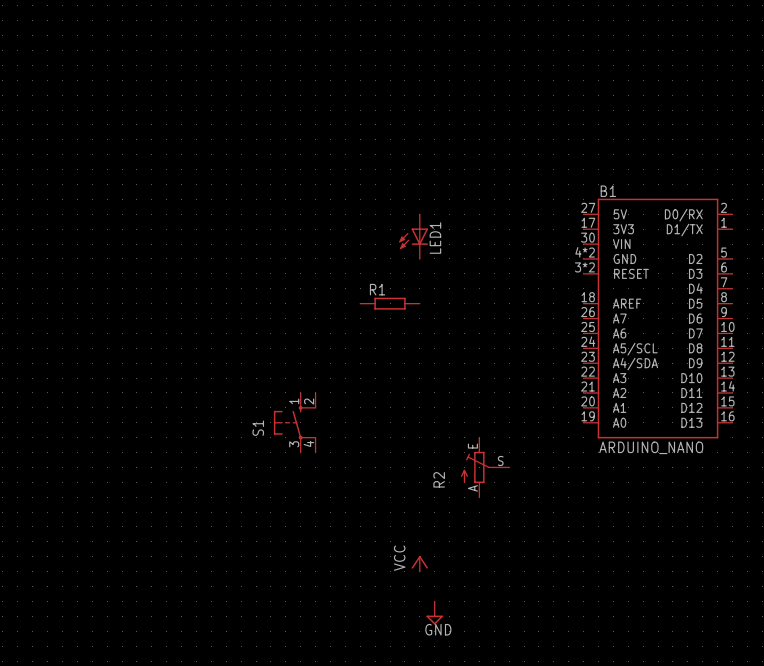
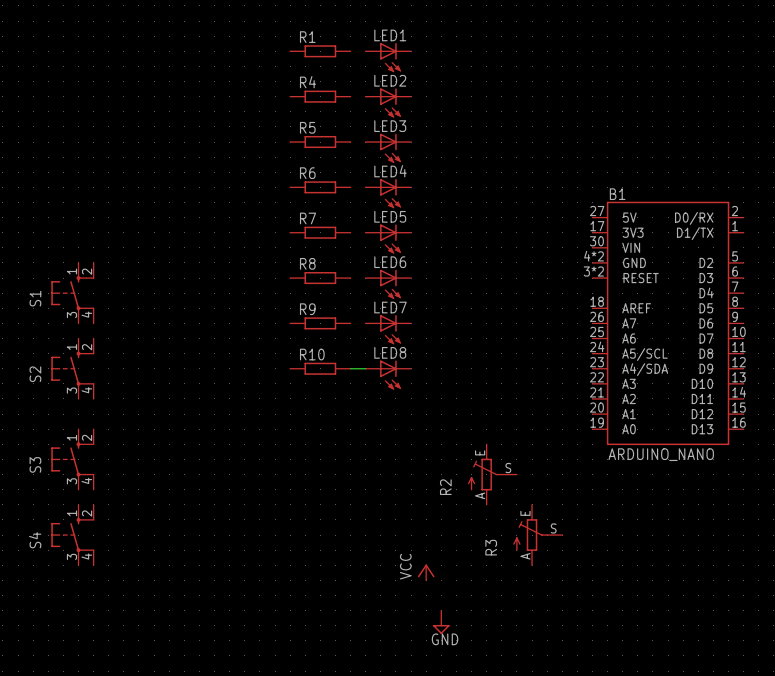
R4: none -> (320, 96)
LED2: none -> (388, 102)
R5: none -> (320, 142)
LED3: none -> (388, 148)
R6: none -> (320, 187)
LED4: none -> (388, 193)
R7: none -> (320, 232)
LED5: none -> (388, 238)
LED1 position: (413, 236) -> (388, 57)
LED1 rotation: 0° (413, 238) -> 90° counterclockwise (390, 57)
R8: none -> (320, 278)
LED6: none -> (388, 284)
R1 position: (390, 303) -> (320, 51)
R9: none -> (320, 323)
LED7: none -> (388, 329)
S2: none -> (72, 368)
R10: none -> (320, 368)
wire: none -> (350, 368) (365, 368)
LED8: none -> (388, 375)
S1 position: (294, 422) -> (72, 293)
S3: none -> (72, 459)
S4: none -> (72, 535)
R3: none -> (537, 535)

